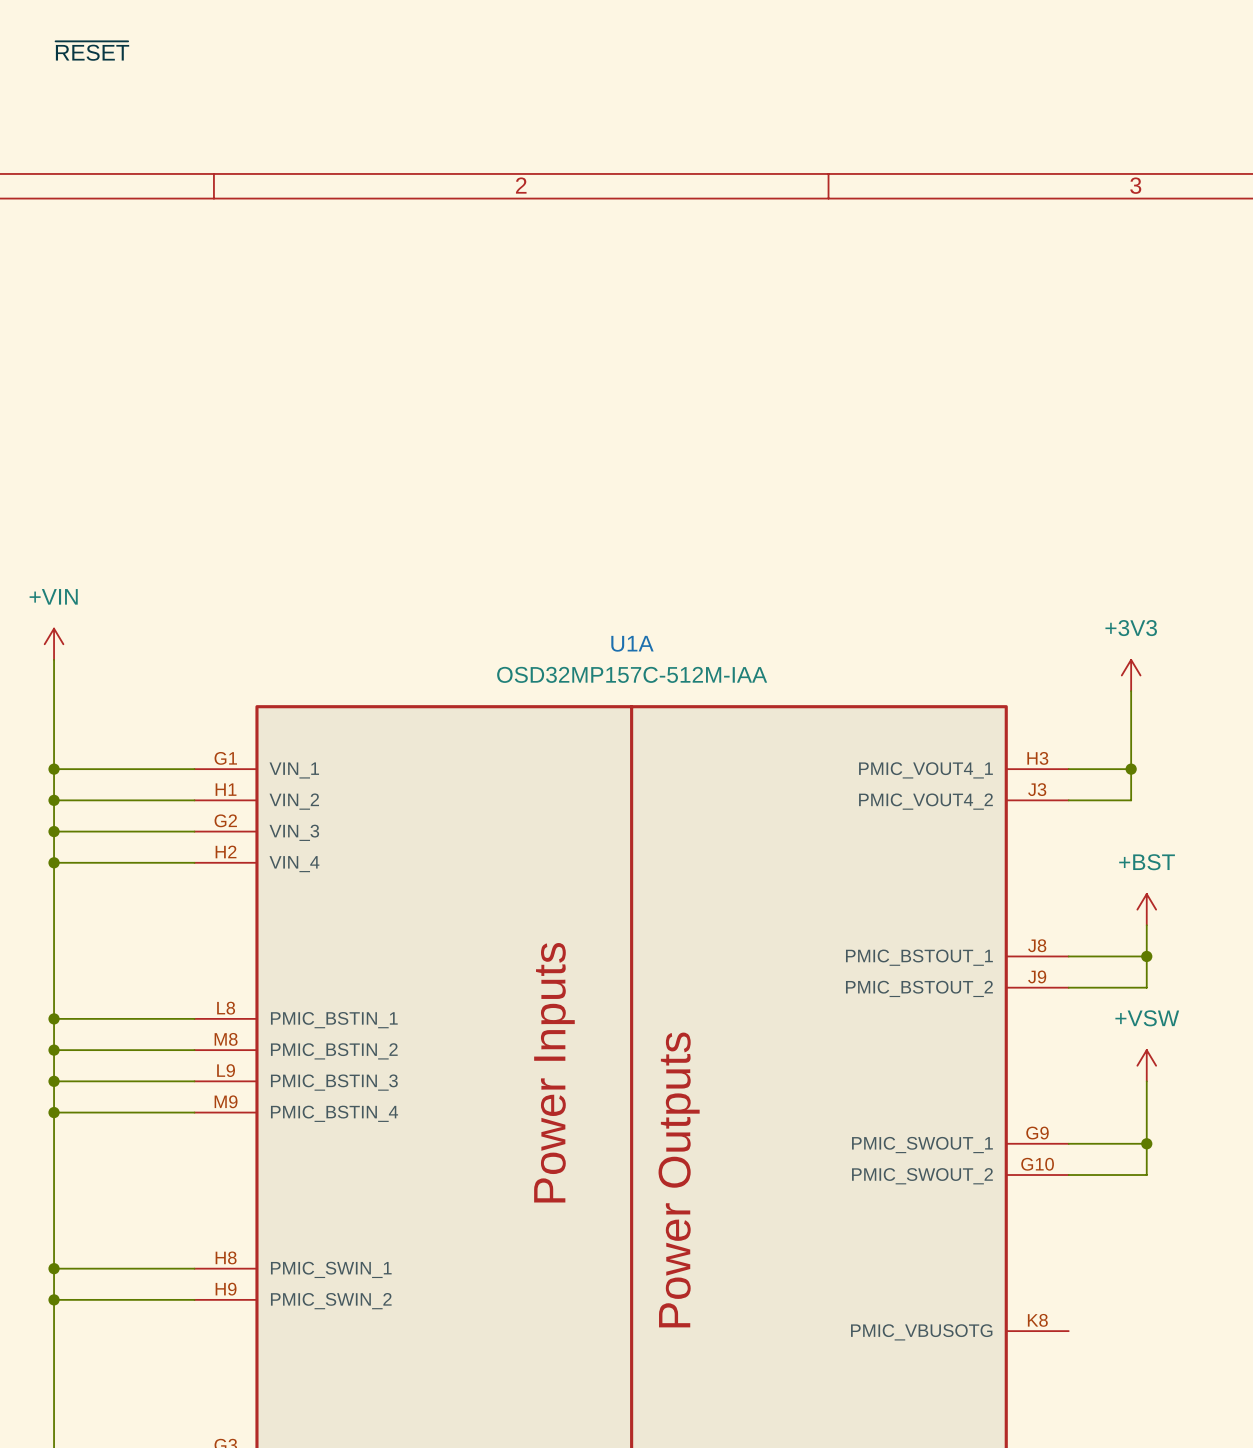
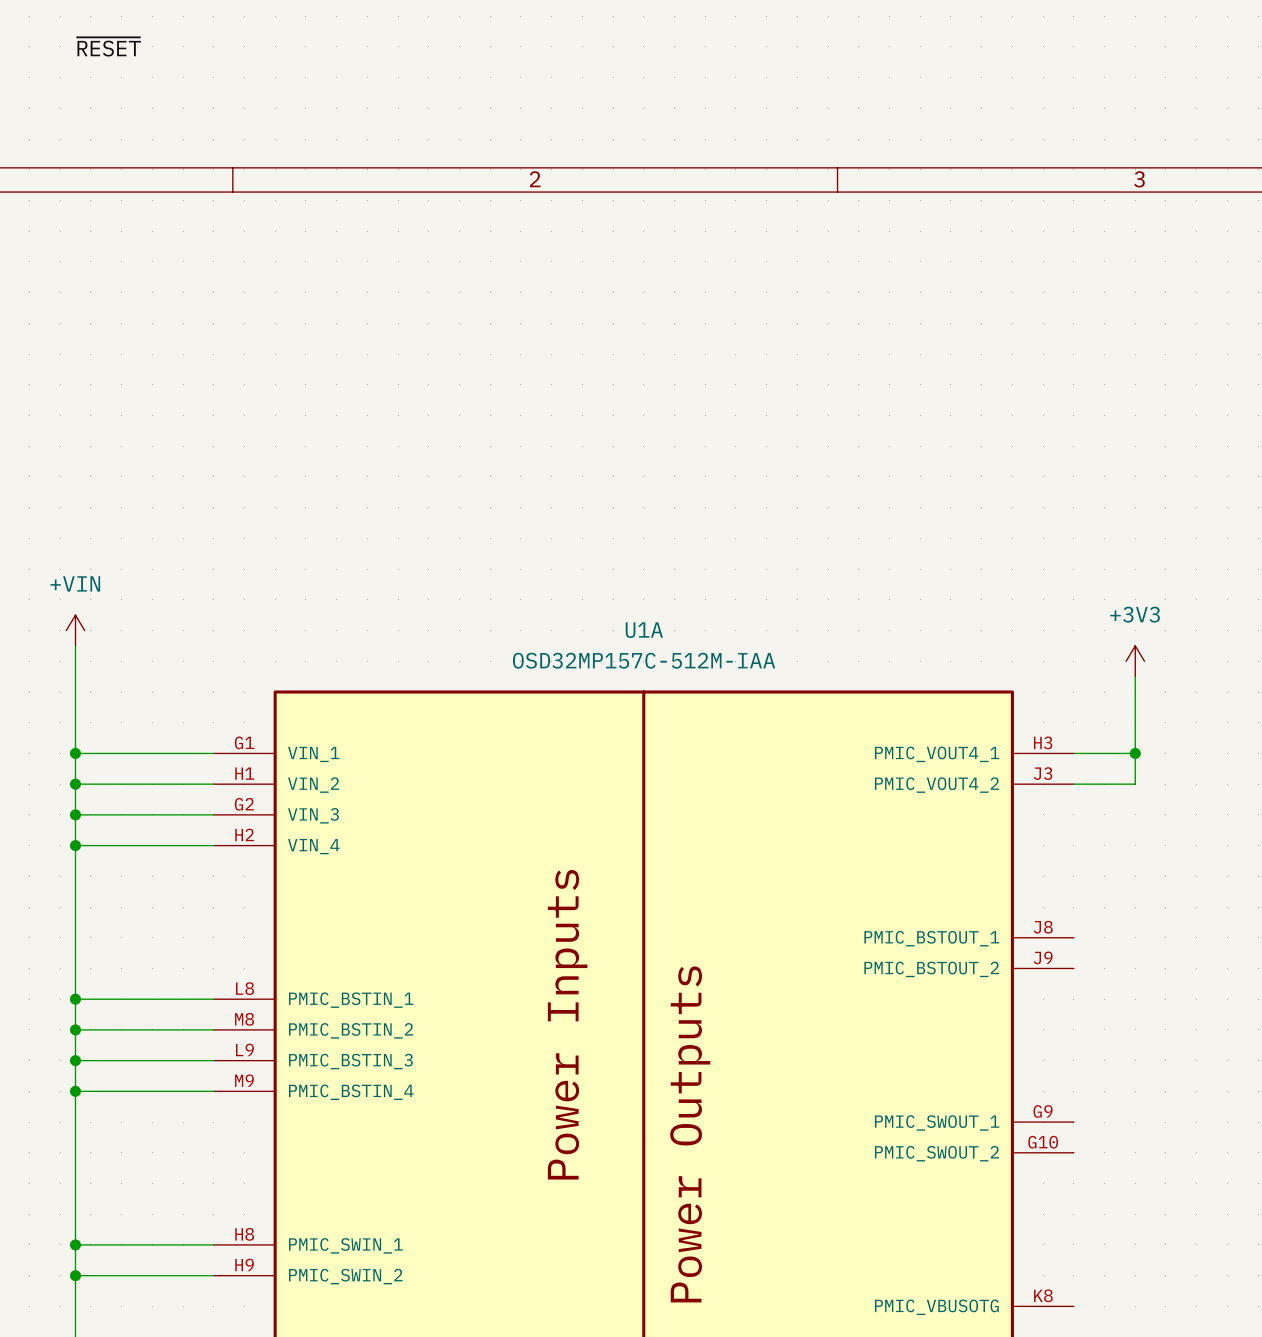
power symbol: +BST (1146, 909) -> none
wire: (1146, 925) (1146, 987) (1068, 987) -> none
wire: (1068, 956) (1146, 956) -> none
junction: (1146, 956) -> none
power symbol: +VSW (1146, 1065) -> none
wire: (1146, 1081) (1146, 1175) (1068, 1175) -> none
wire: (1068, 1143) (1146, 1143) -> none
junction: (1146, 1143) -> none

